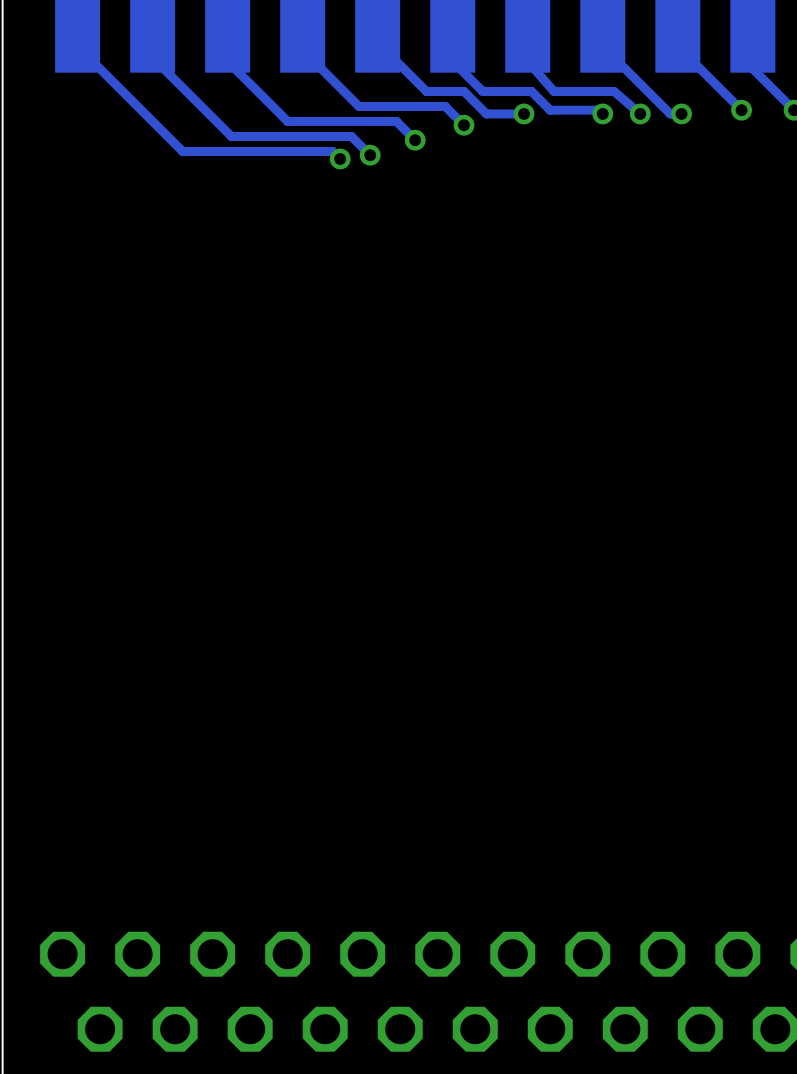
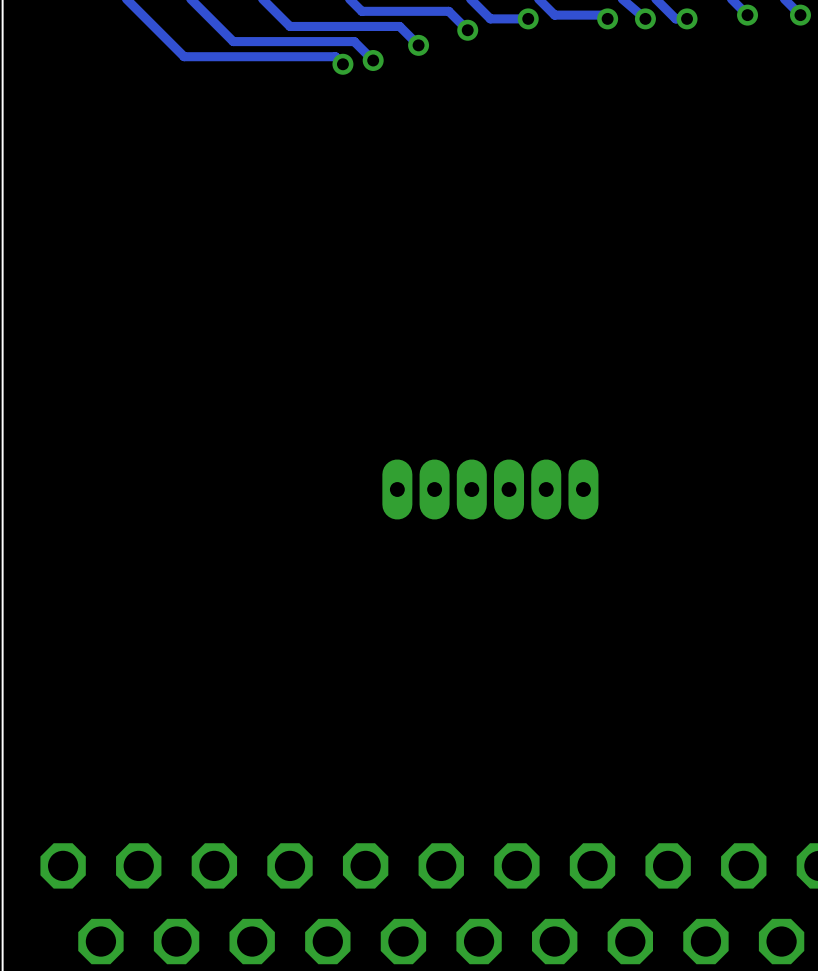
part: none -> (490, 489)

